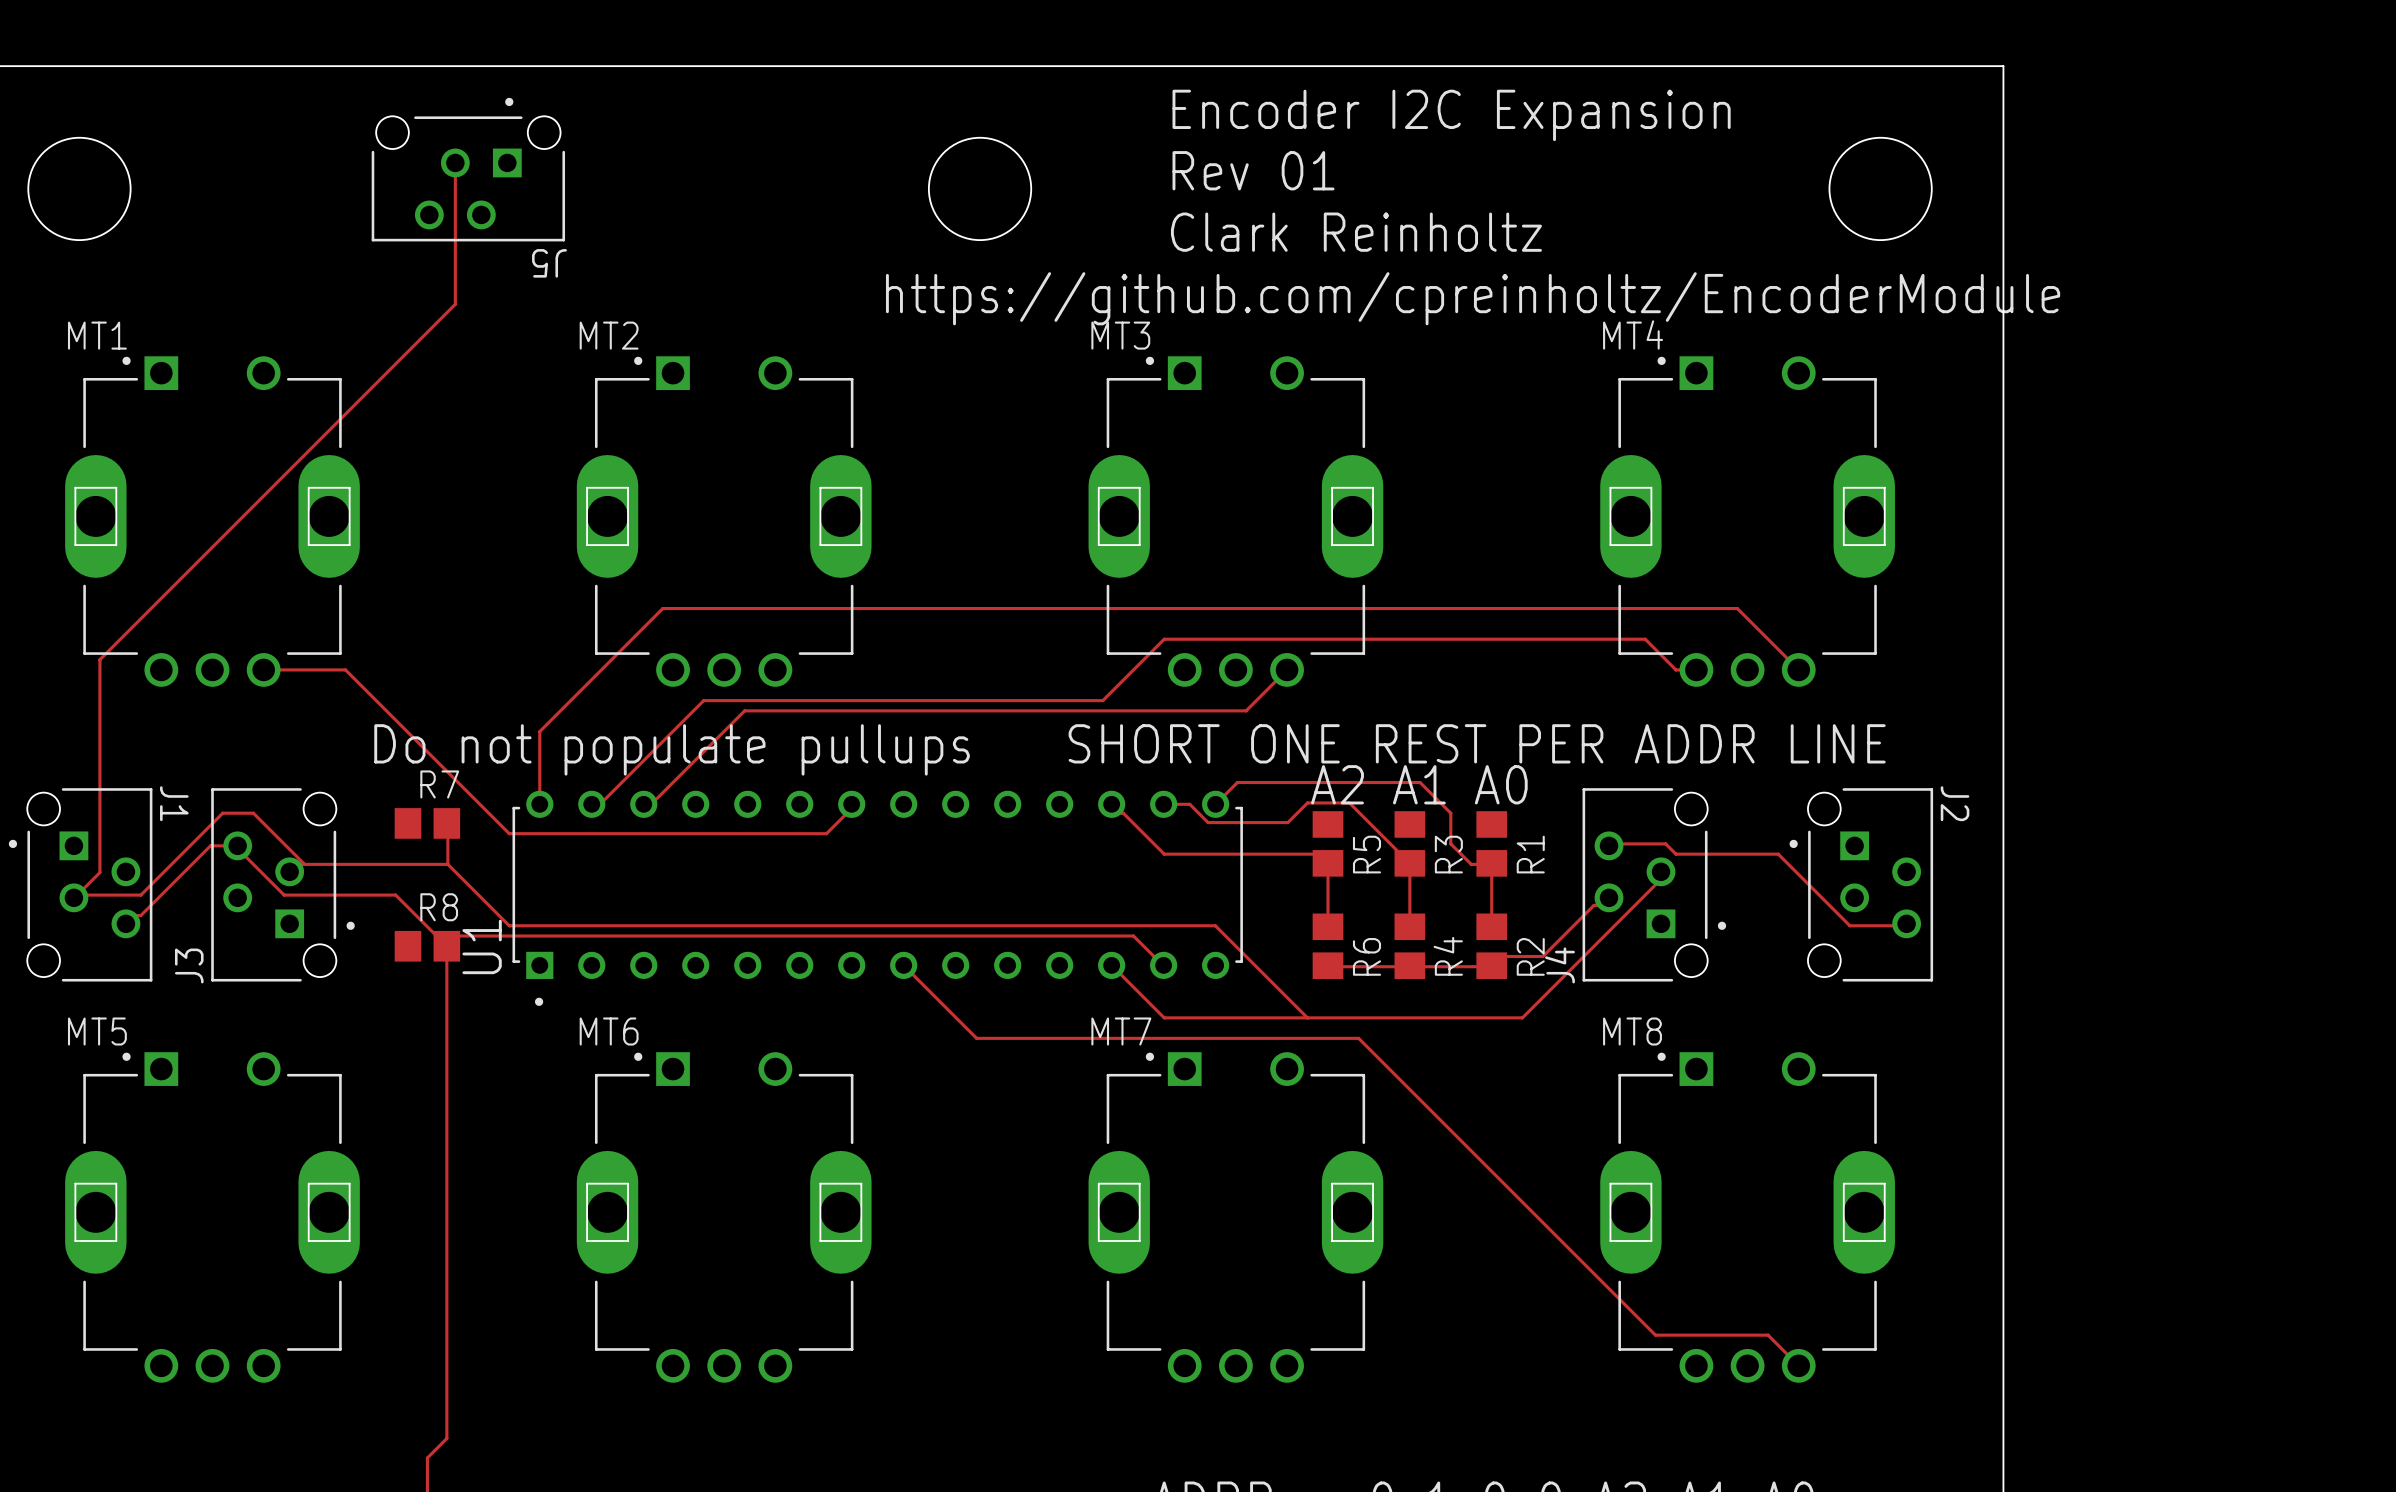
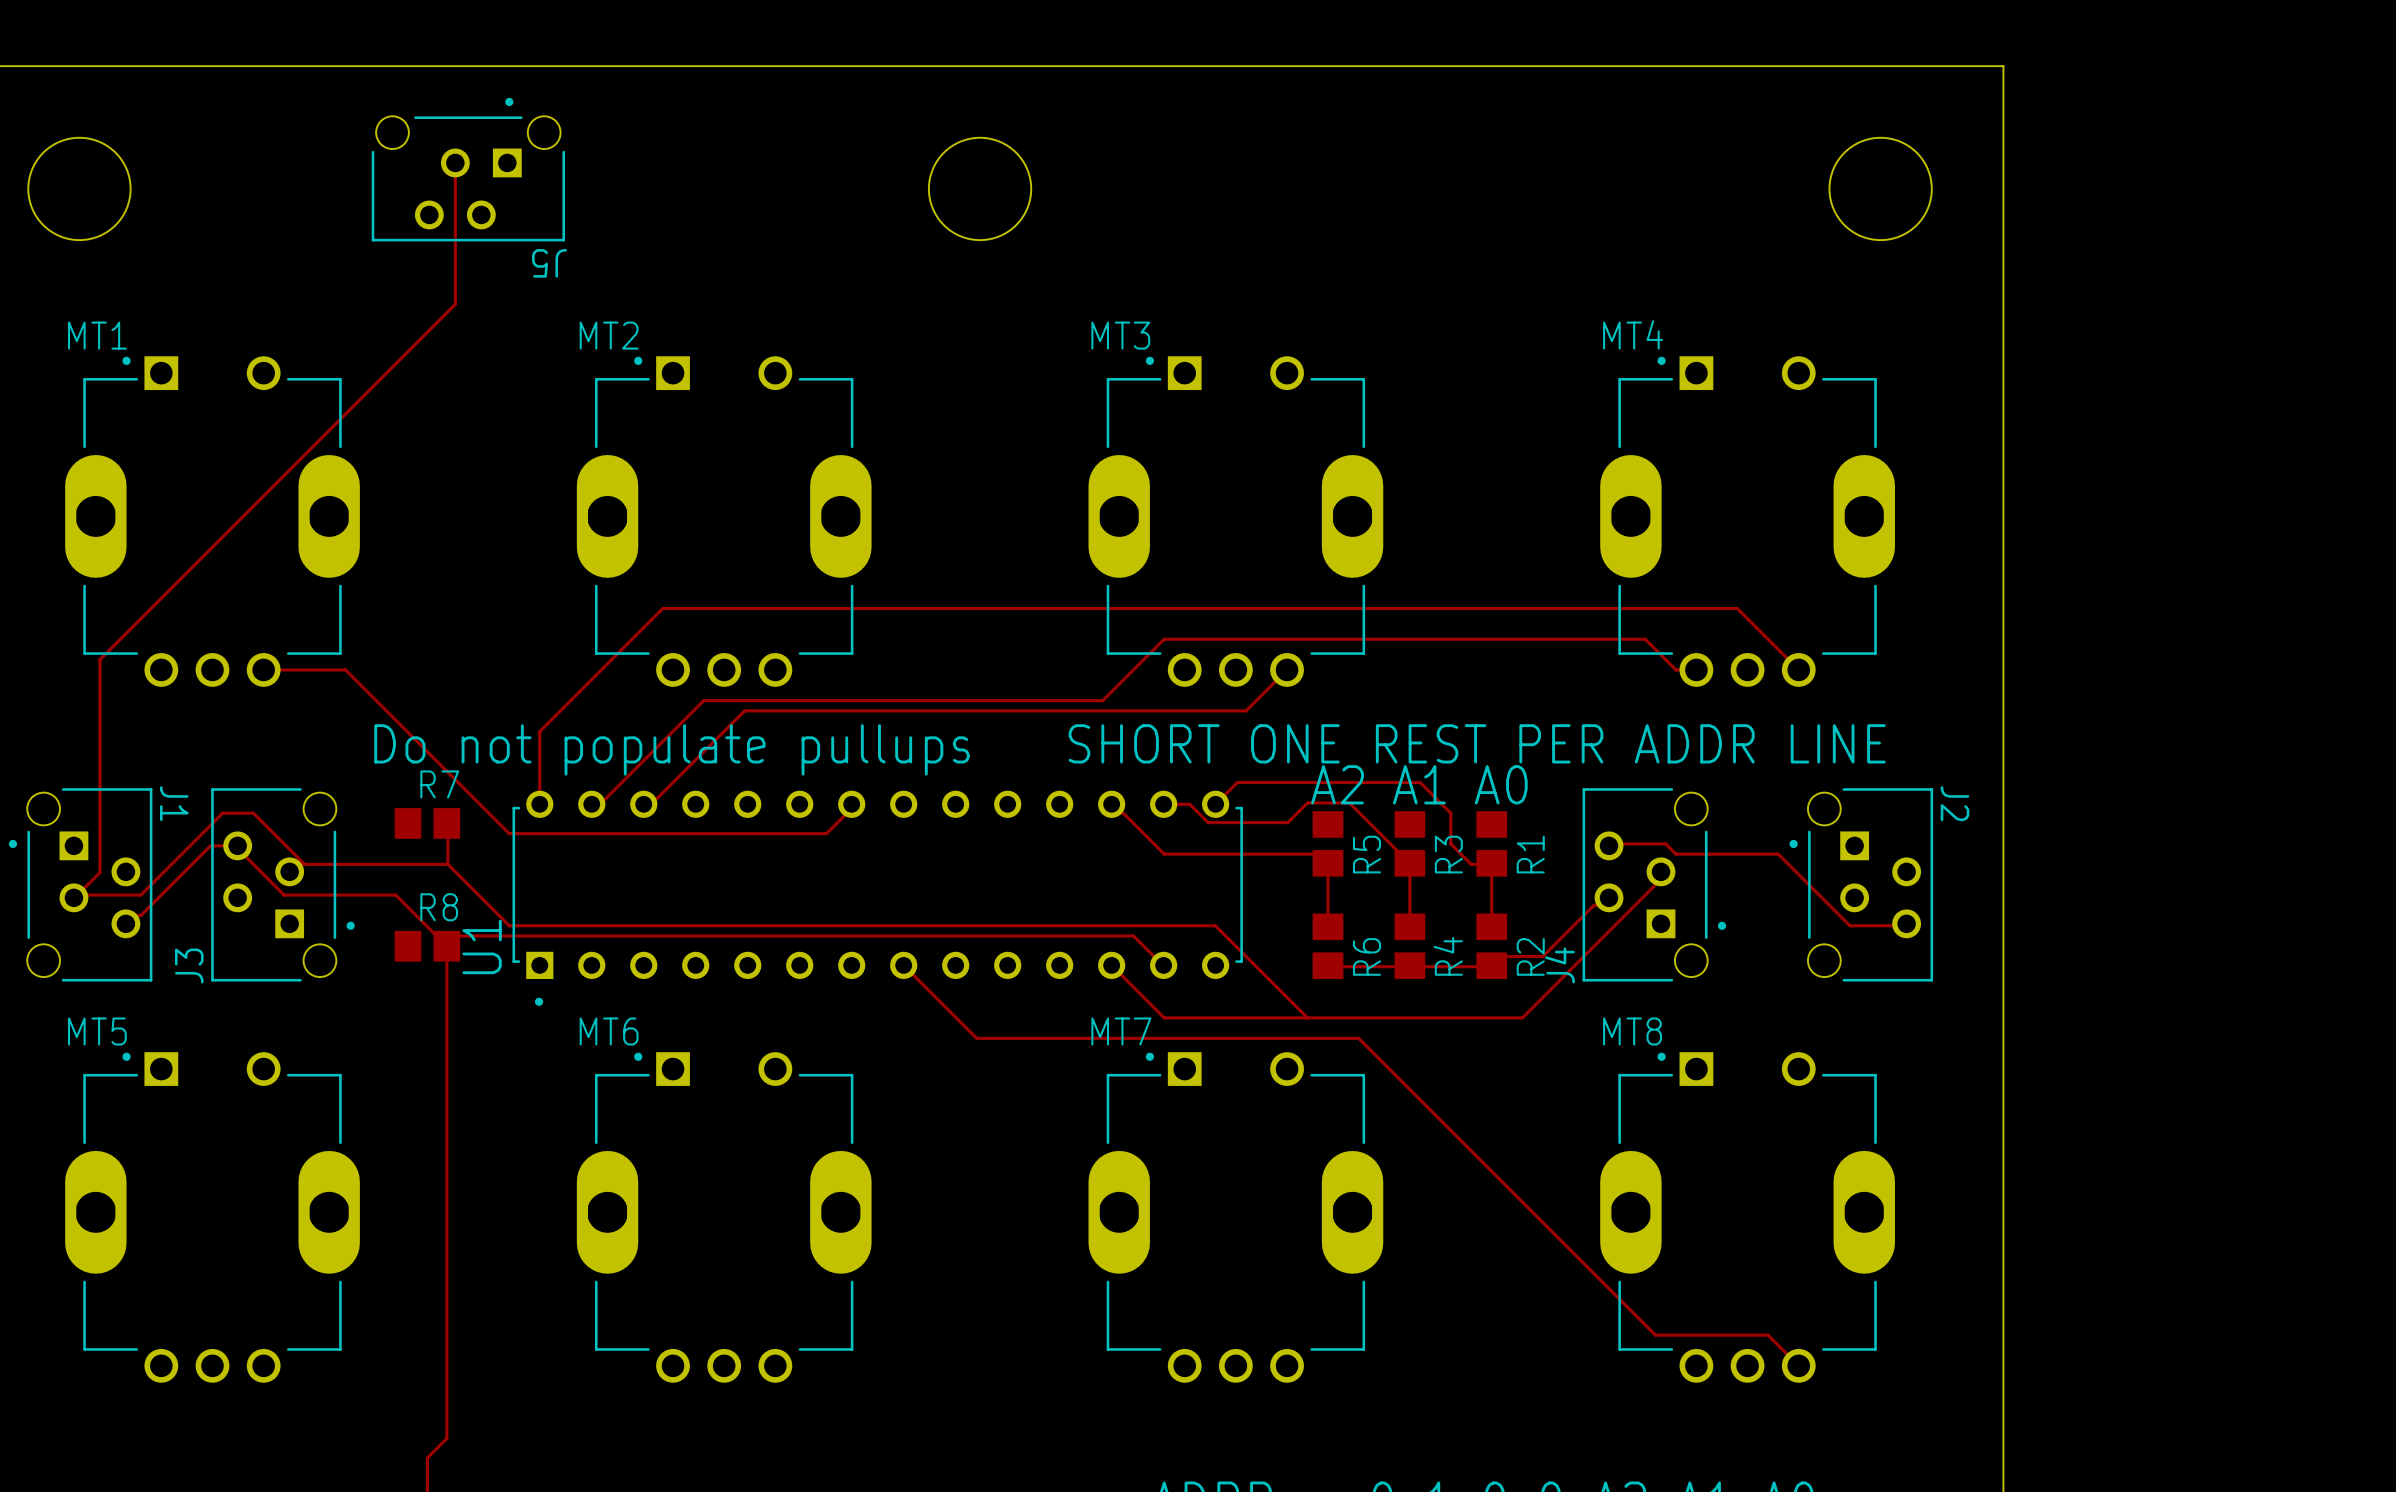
text: Encoder I2C Expansion (1451, 115) -> none
text: Rev 01 (1253, 170) -> none
text: Clark Reinholtz (1356, 232) -> none
text: https://github.com/cpreinholtz/EncoderModule (1473, 298) -> none

